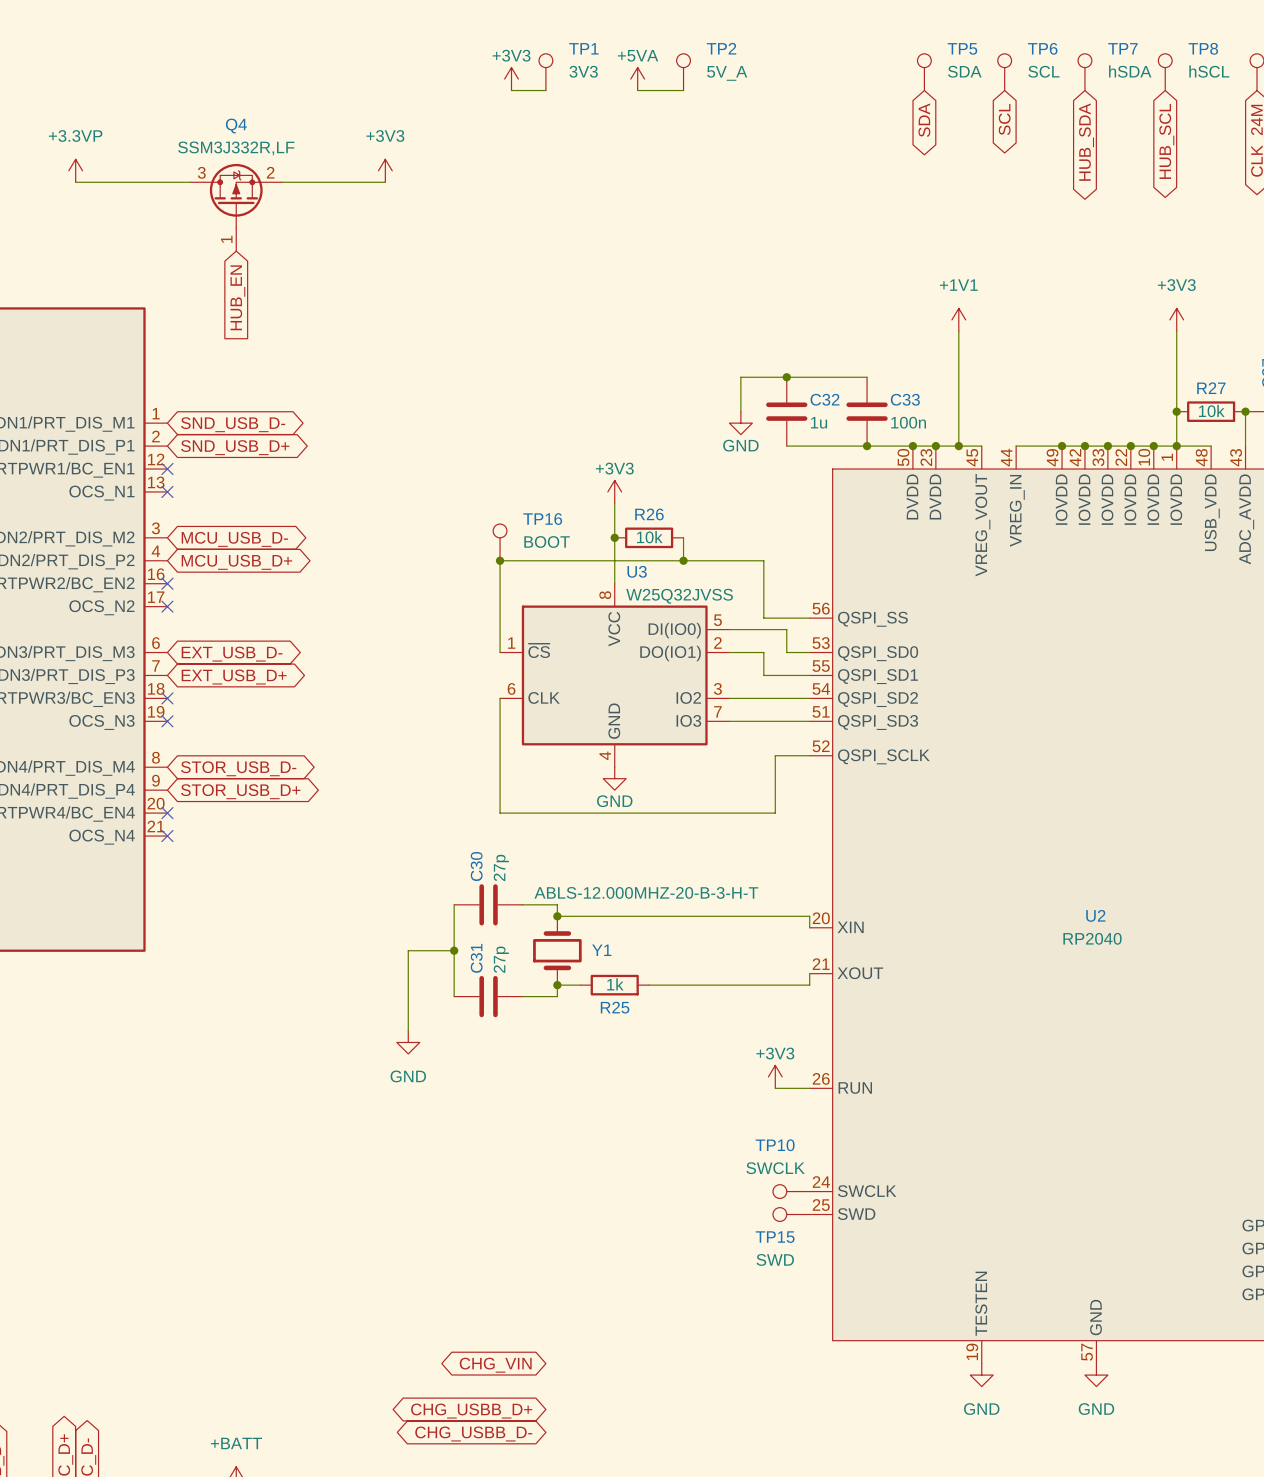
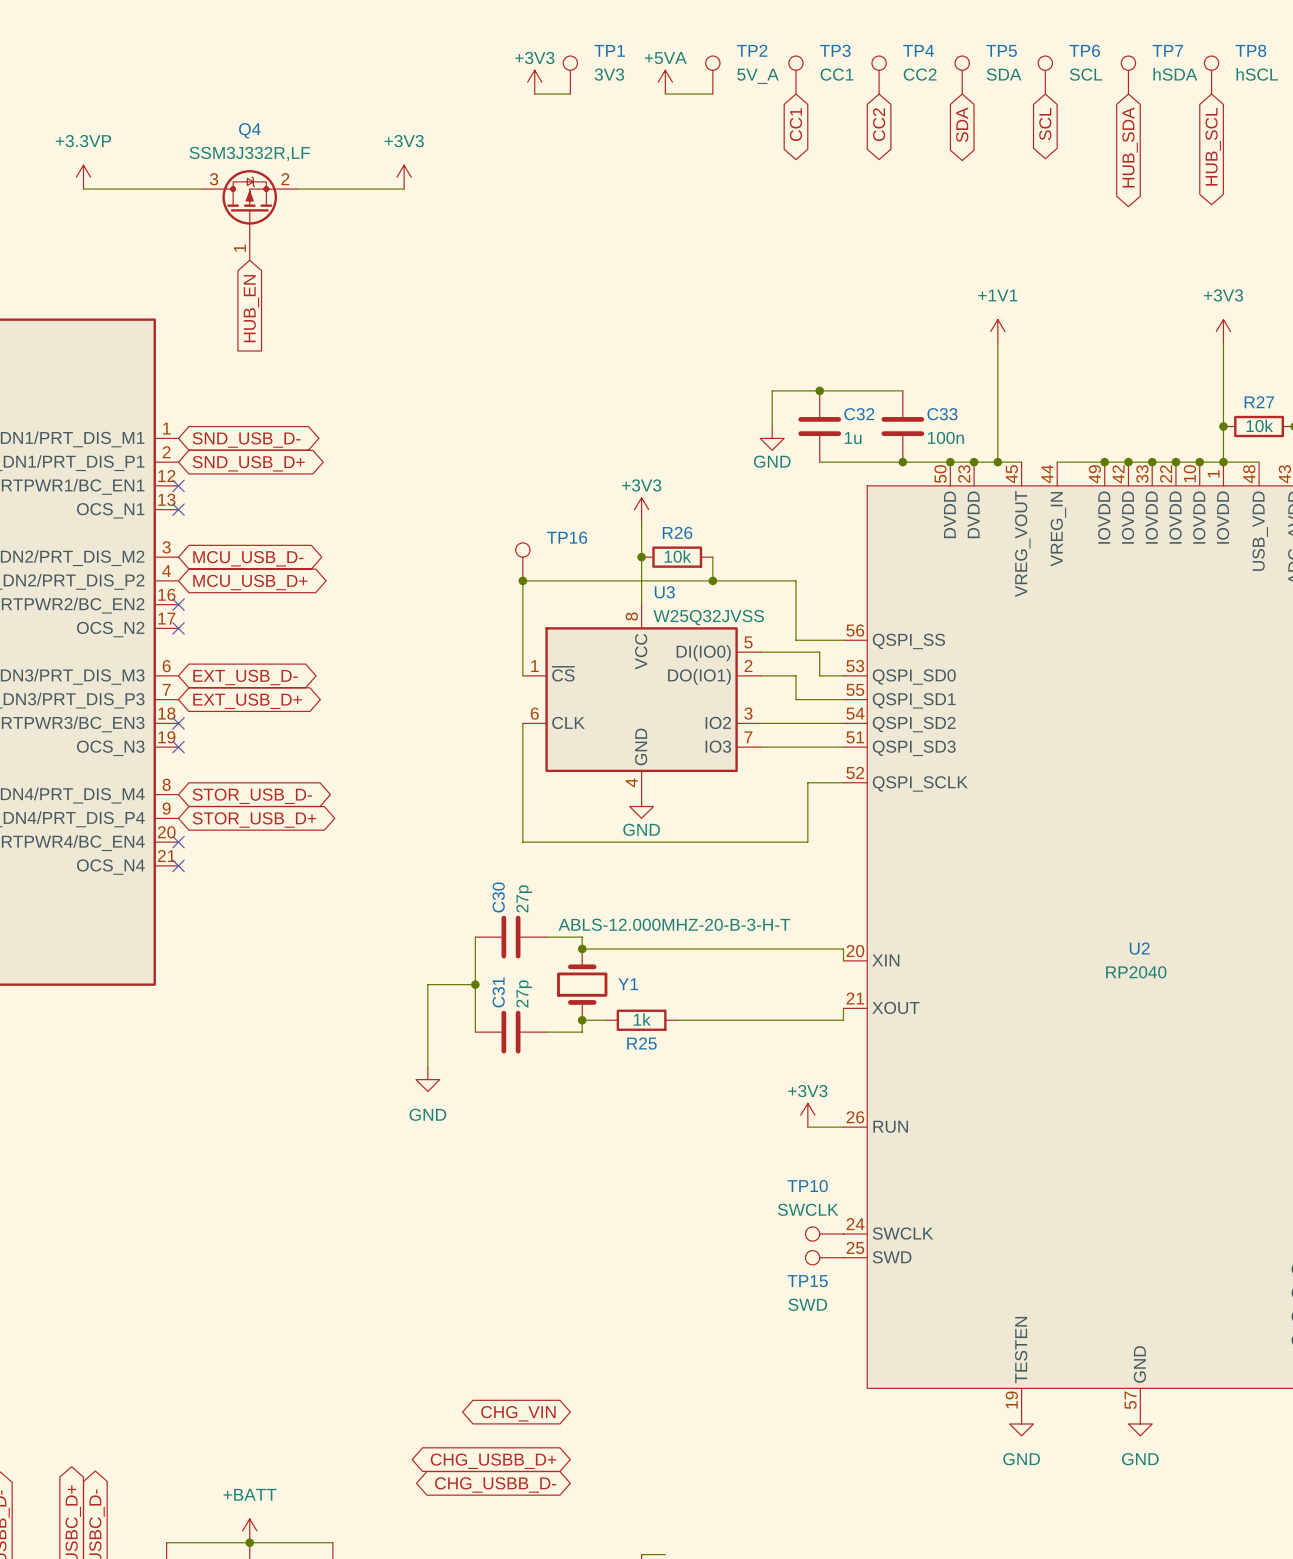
TP3: none -> CC1 (795, 75)
TP4: none -> CC2 (879, 75)
global label: none -> CC1 (795, 124)
global label: none -> CC2 (879, 124)
TP16 value: BOOT (547, 541) -> none

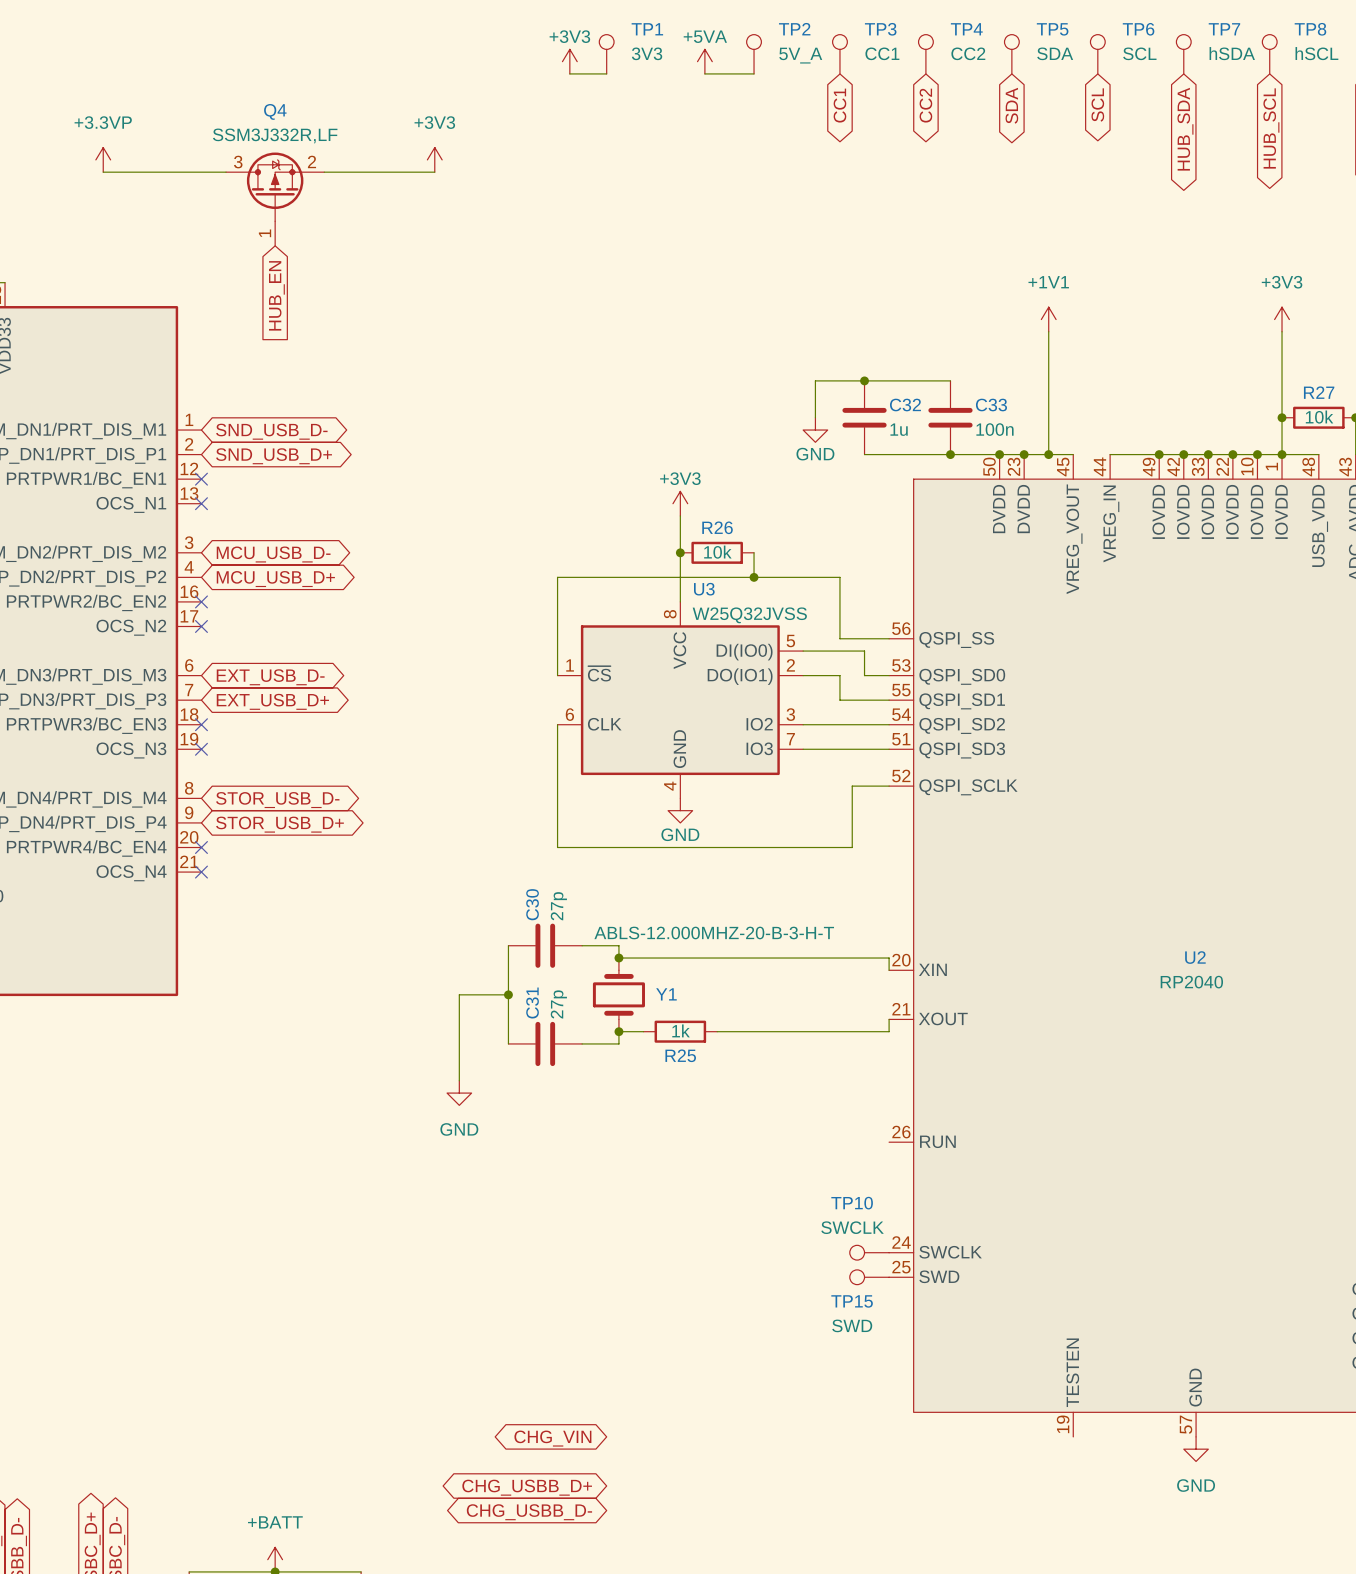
TP16: (522, 561) -> none
junction: (522, 580) -> none
power symbol: +3V3 (807, 1115) -> none
wire: (807, 1127) (843, 1127) -> none
power symbol: GND (1021, 1423) -> none

